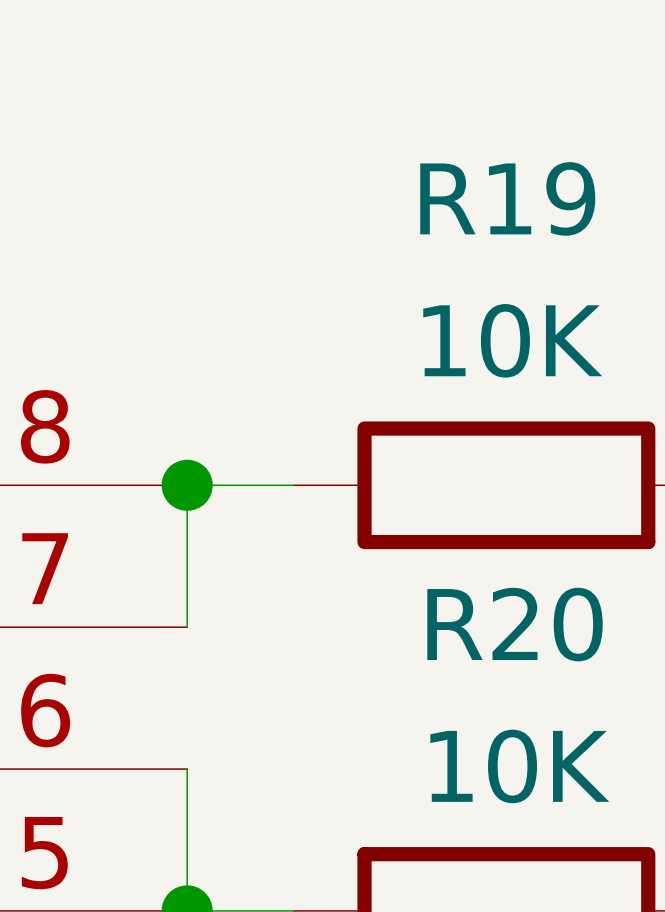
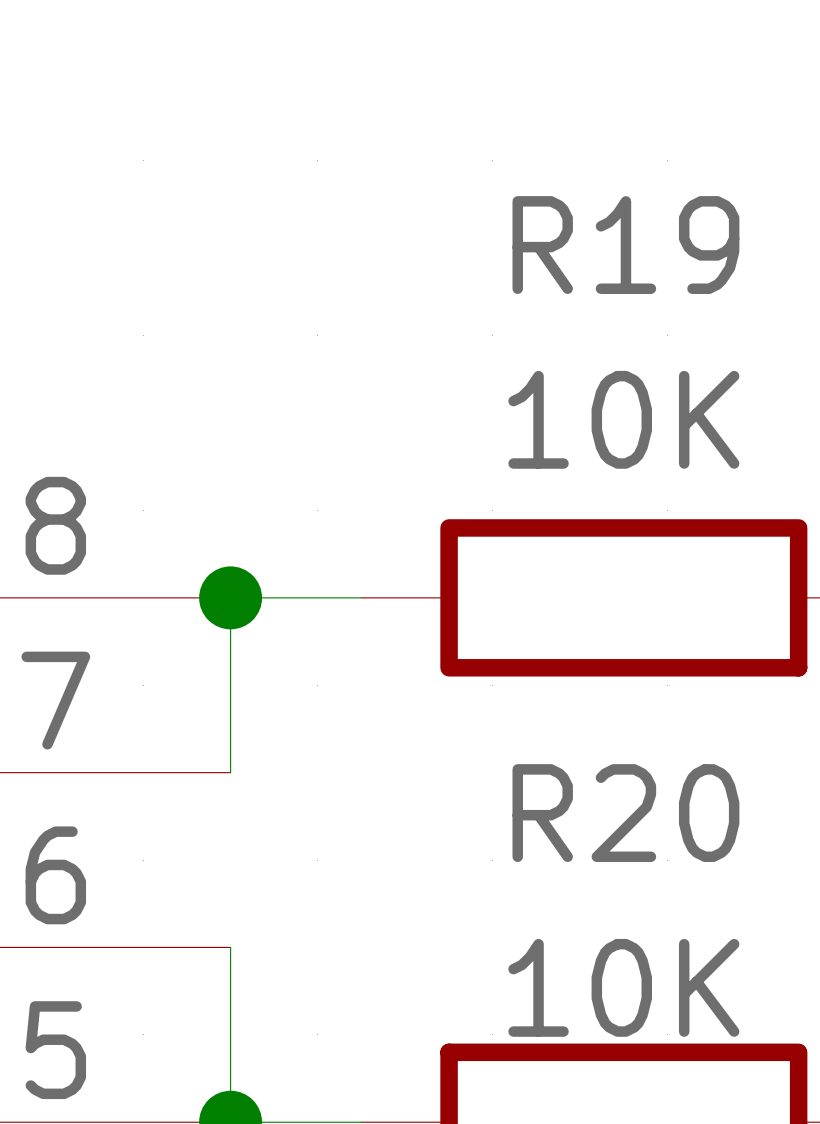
R20 name position: R20 (515, 624) -> R20 (625, 813)
R20 value position: 10K (519, 766) -> 10K (623, 987)

